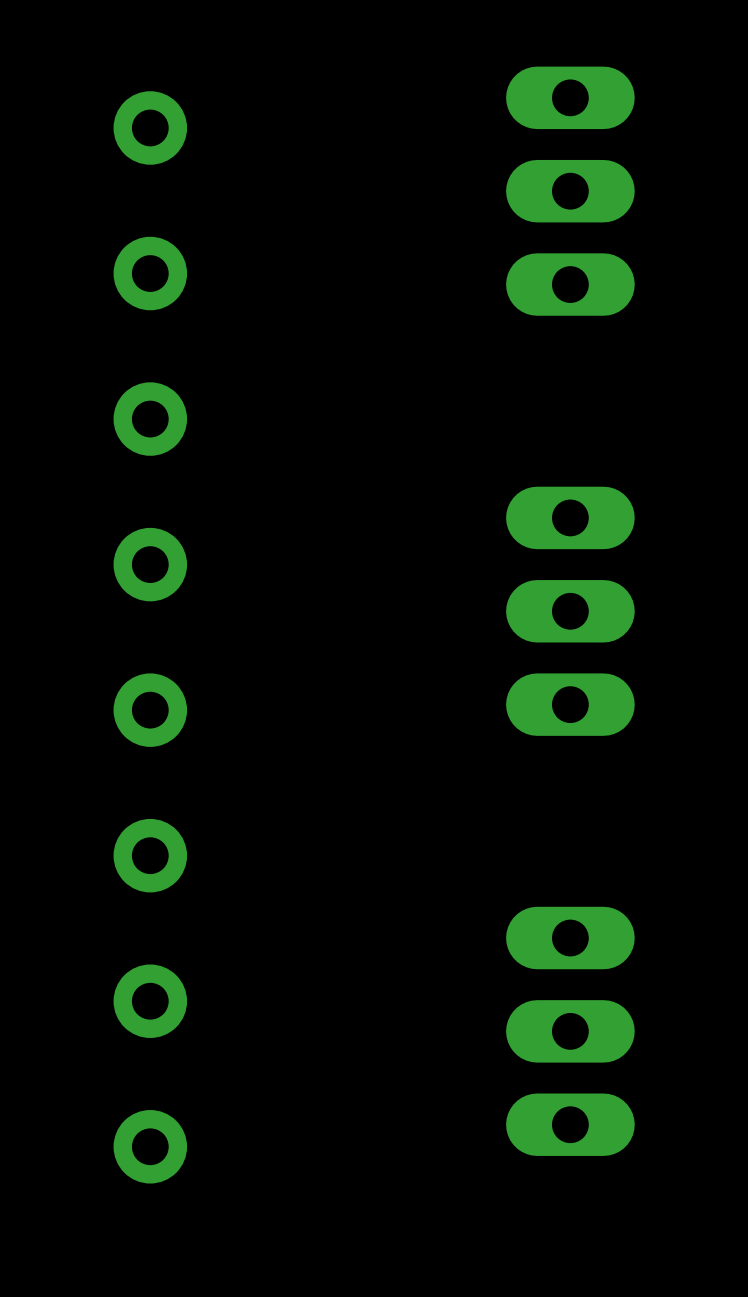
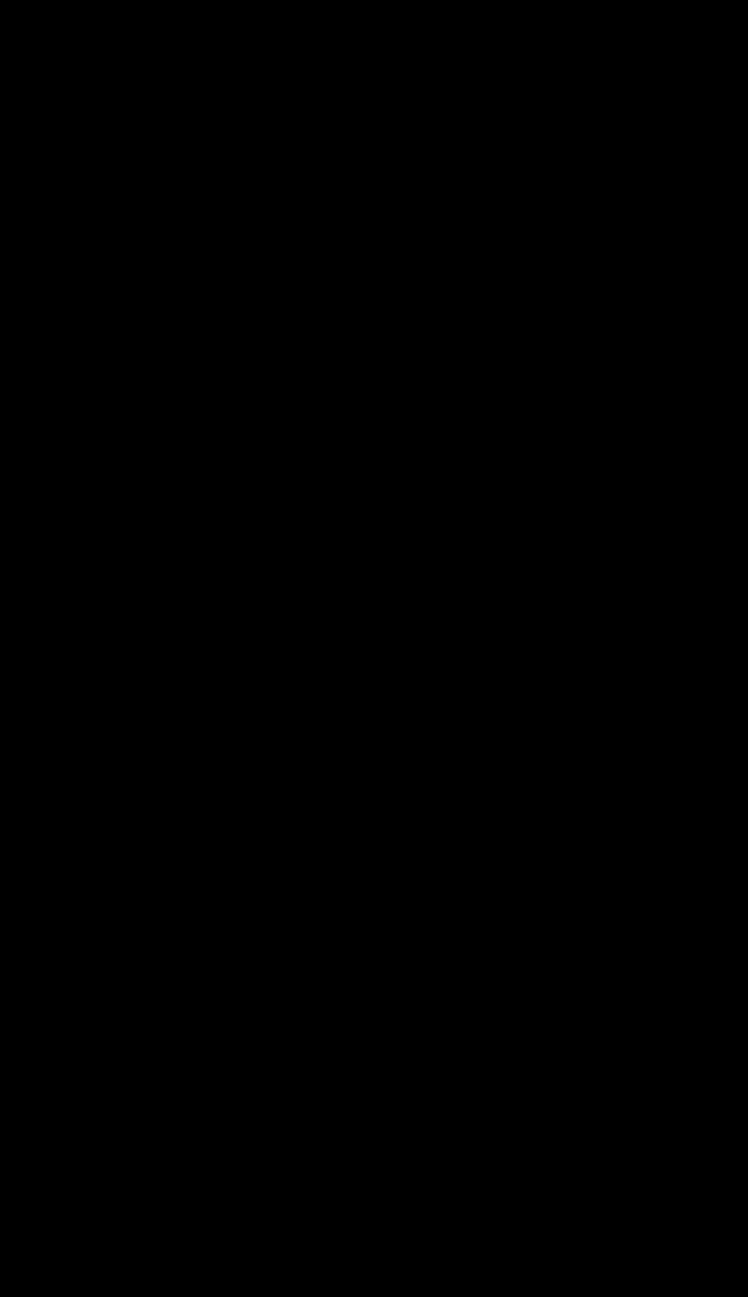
part: (570, 191) -> none
part: (570, 611) -> none
part: (150, 637) -> none
part: (570, 1031) -> none

